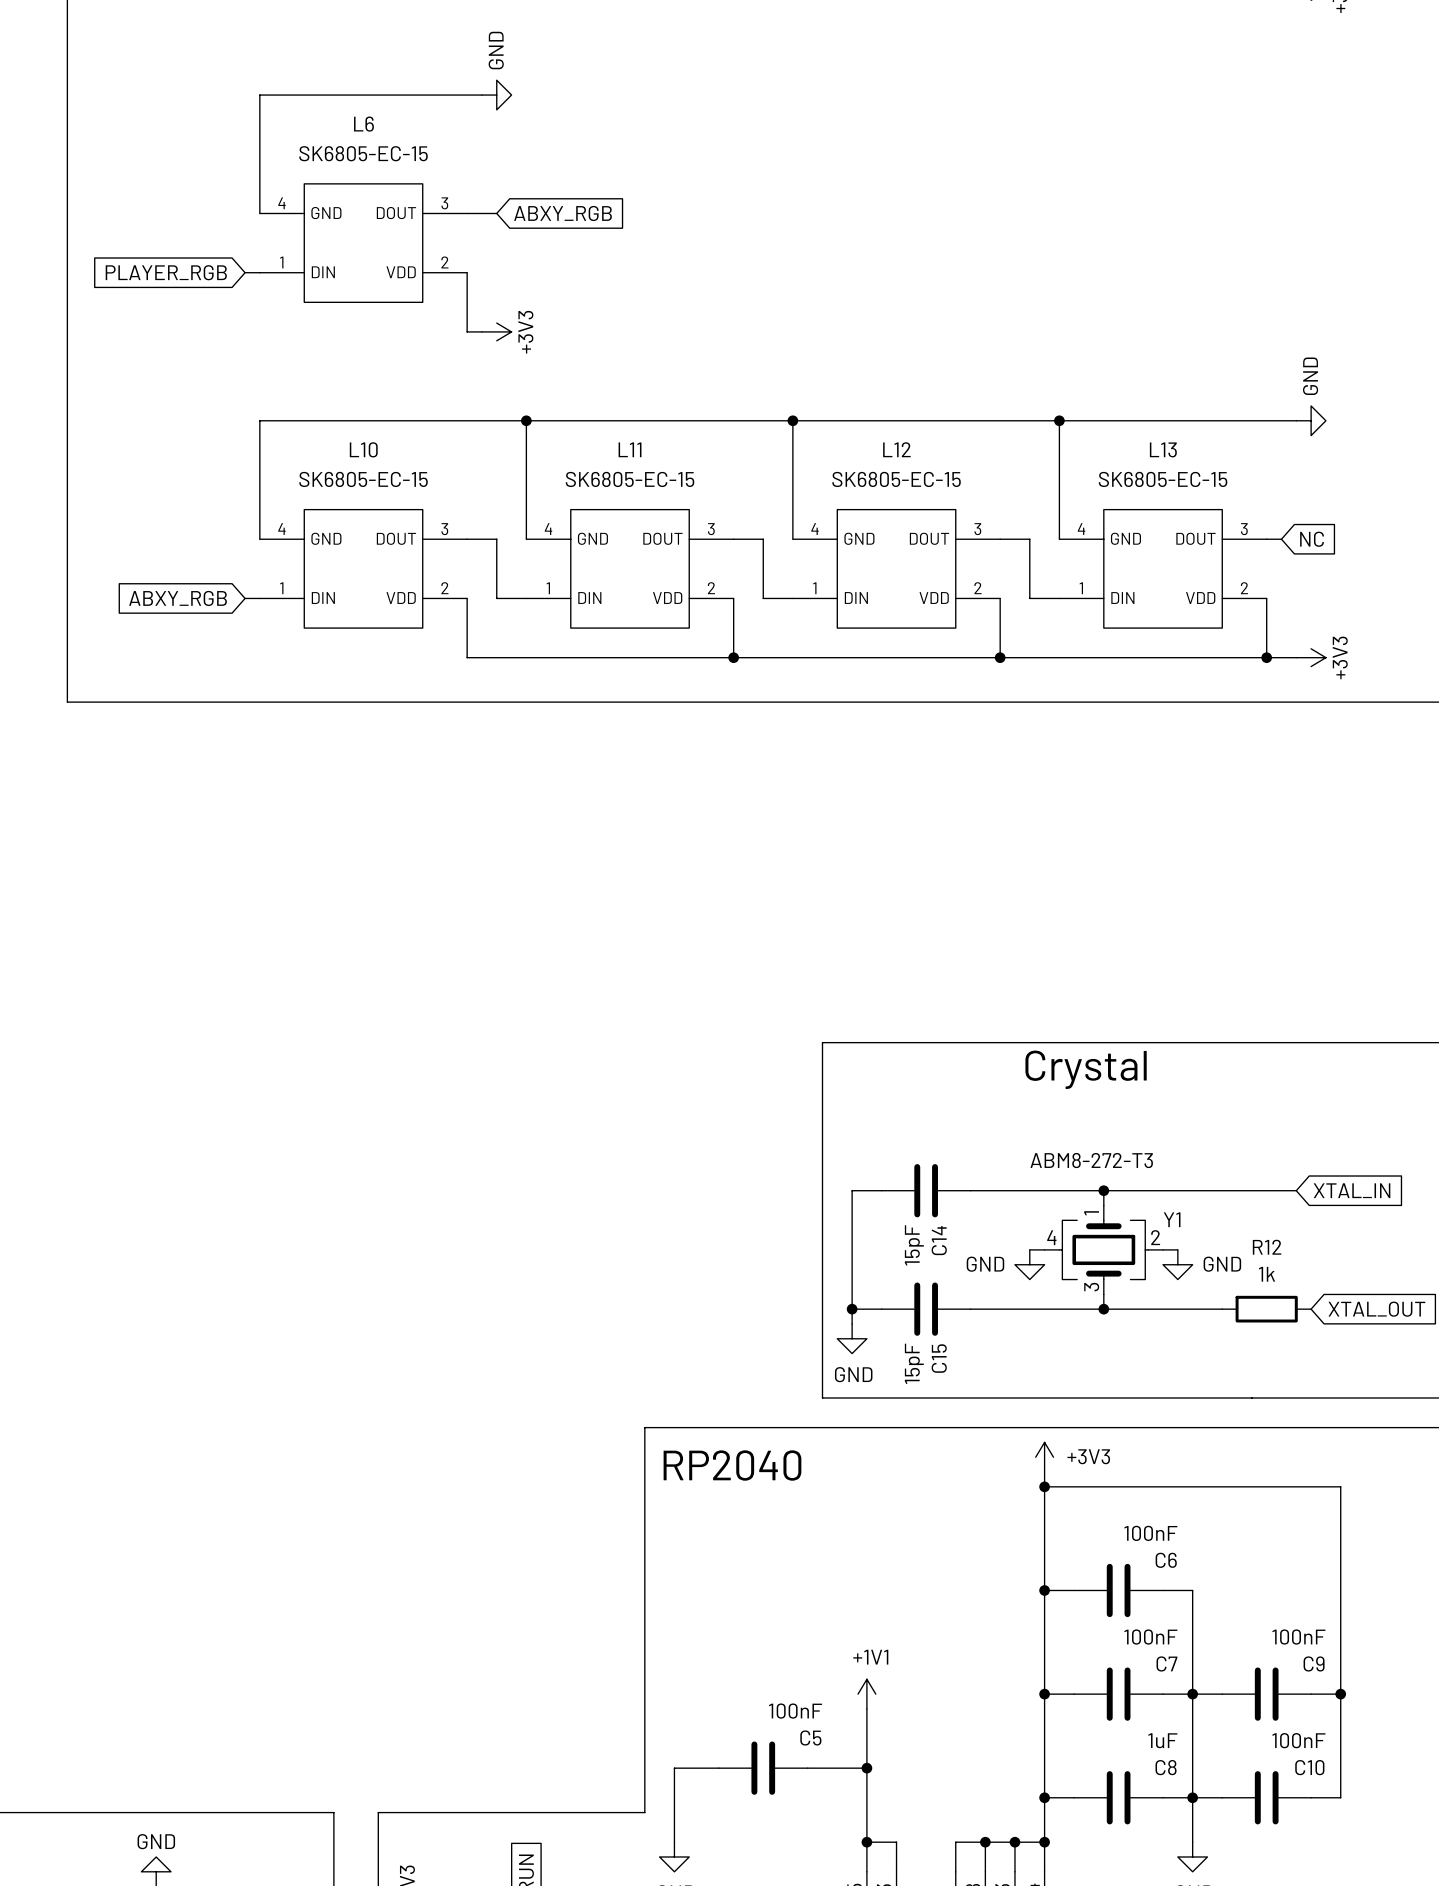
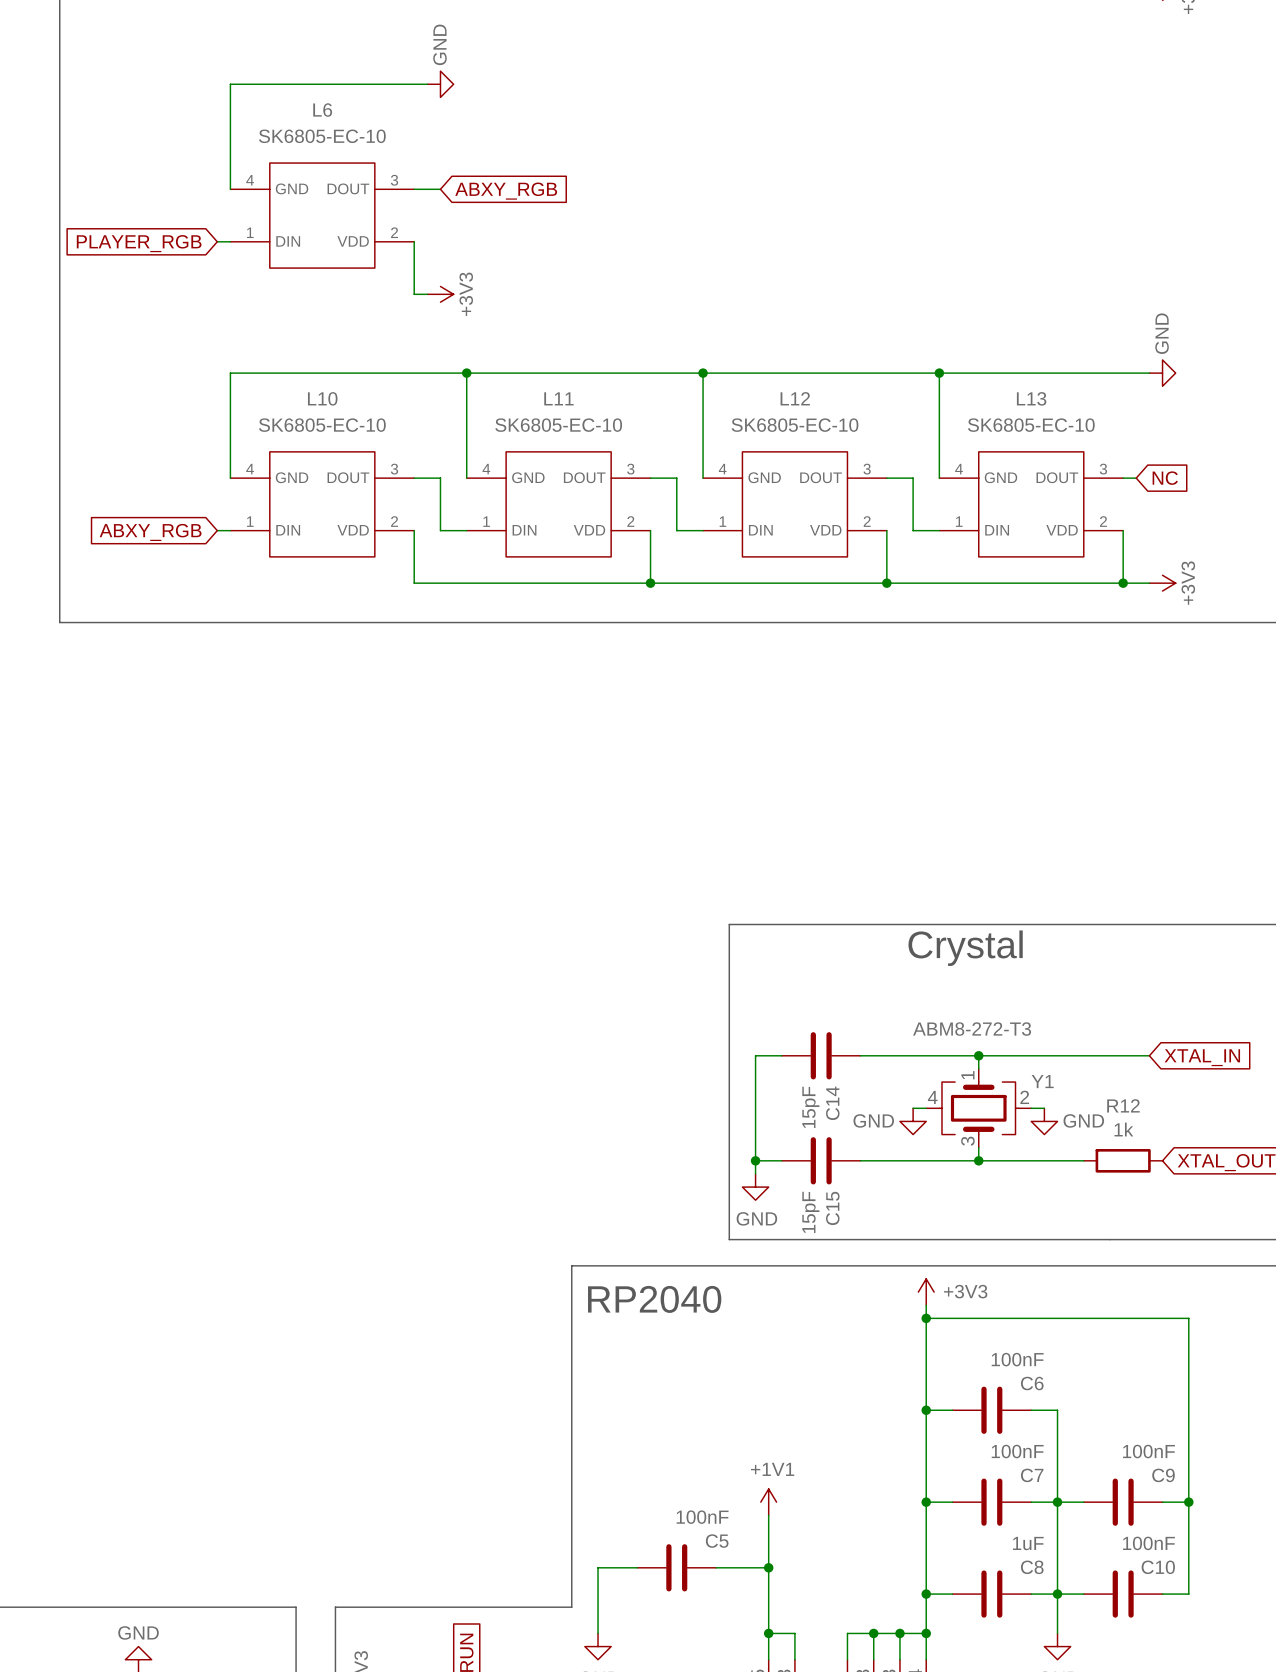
L6 value: SK6805-EC-15 (363, 153) -> SK6805-EC-10 (322, 136)
L10 value: SK6805-EC-15 (363, 479) -> SK6805-EC-10 (322, 425)
L11 value: SK6805-EC-15 (630, 479) -> SK6805-EC-10 (558, 425)
L12 value: SK6805-EC-15 (896, 479) -> SK6805-EC-10 (795, 425)
L13 value: SK6805-EC-15 (1163, 479) -> SK6805-EC-10 (1031, 425)

